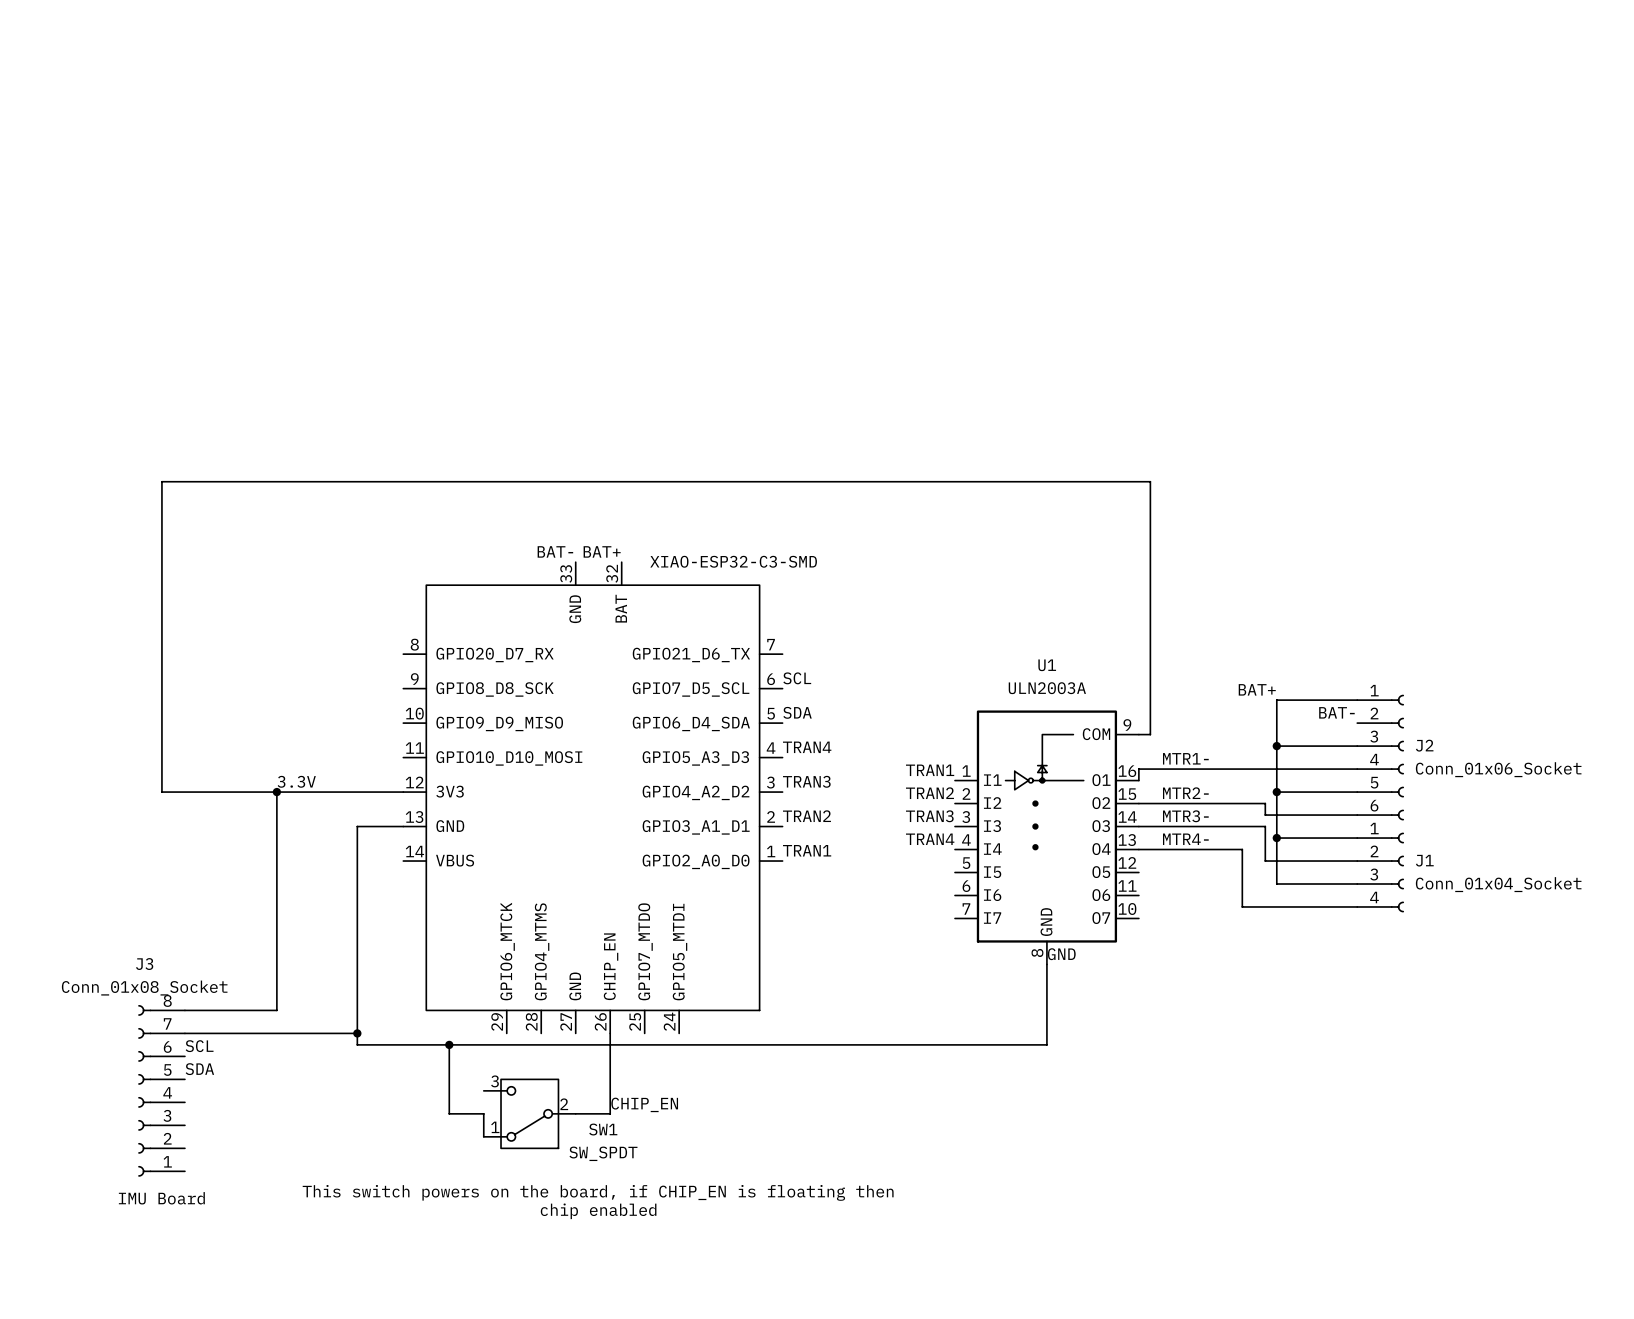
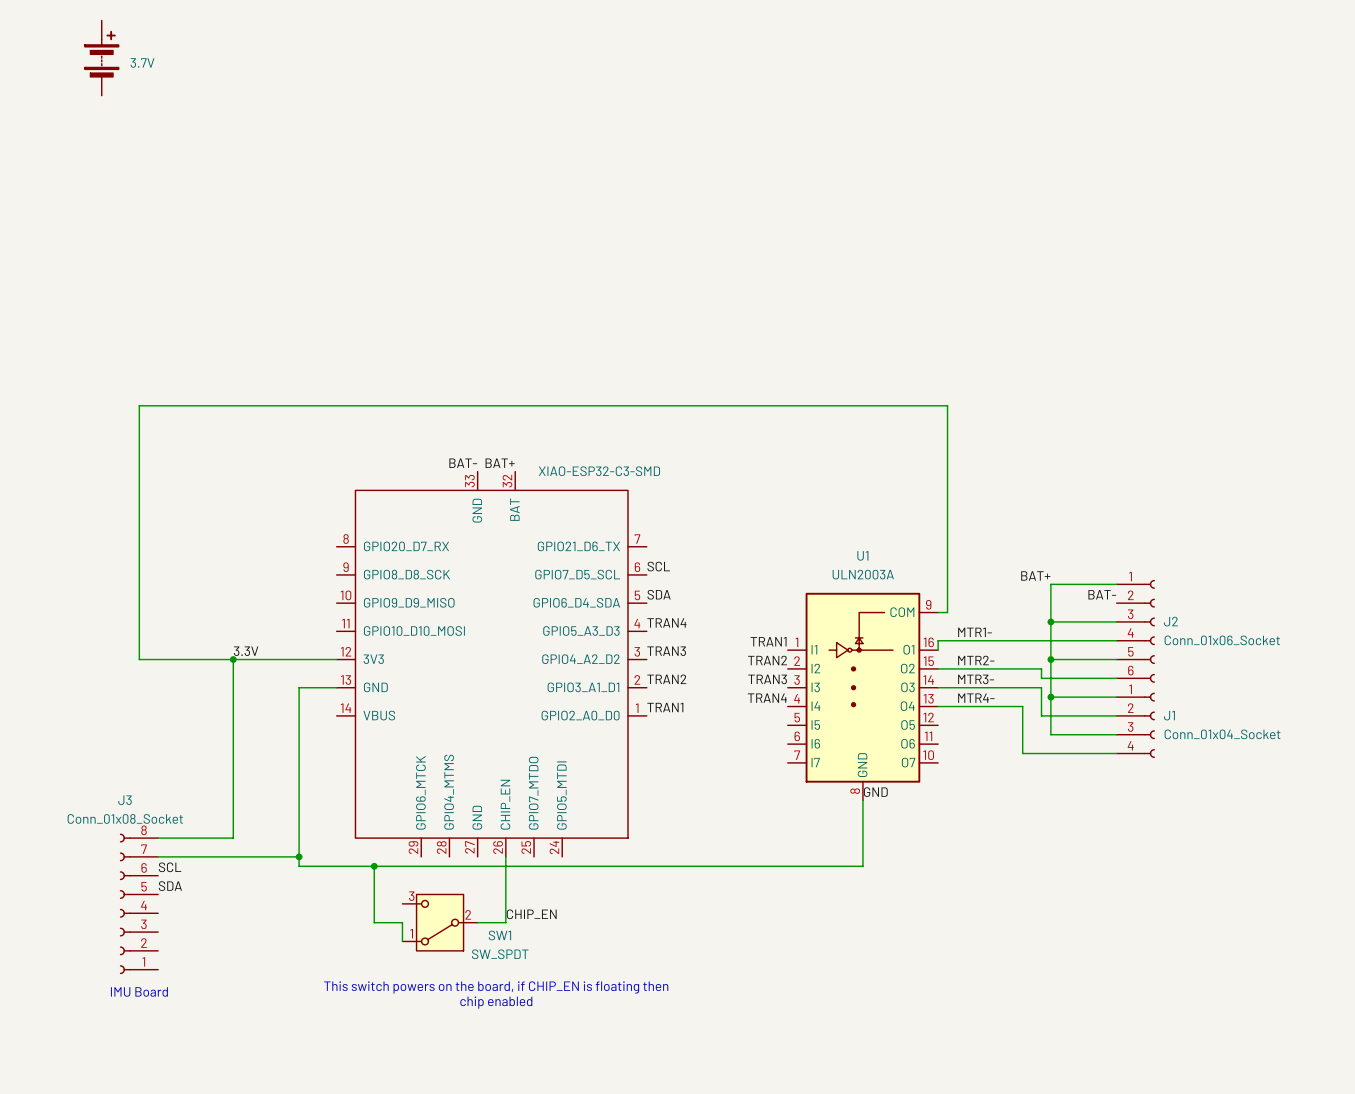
part: none -> 3.7V (101, 58)

